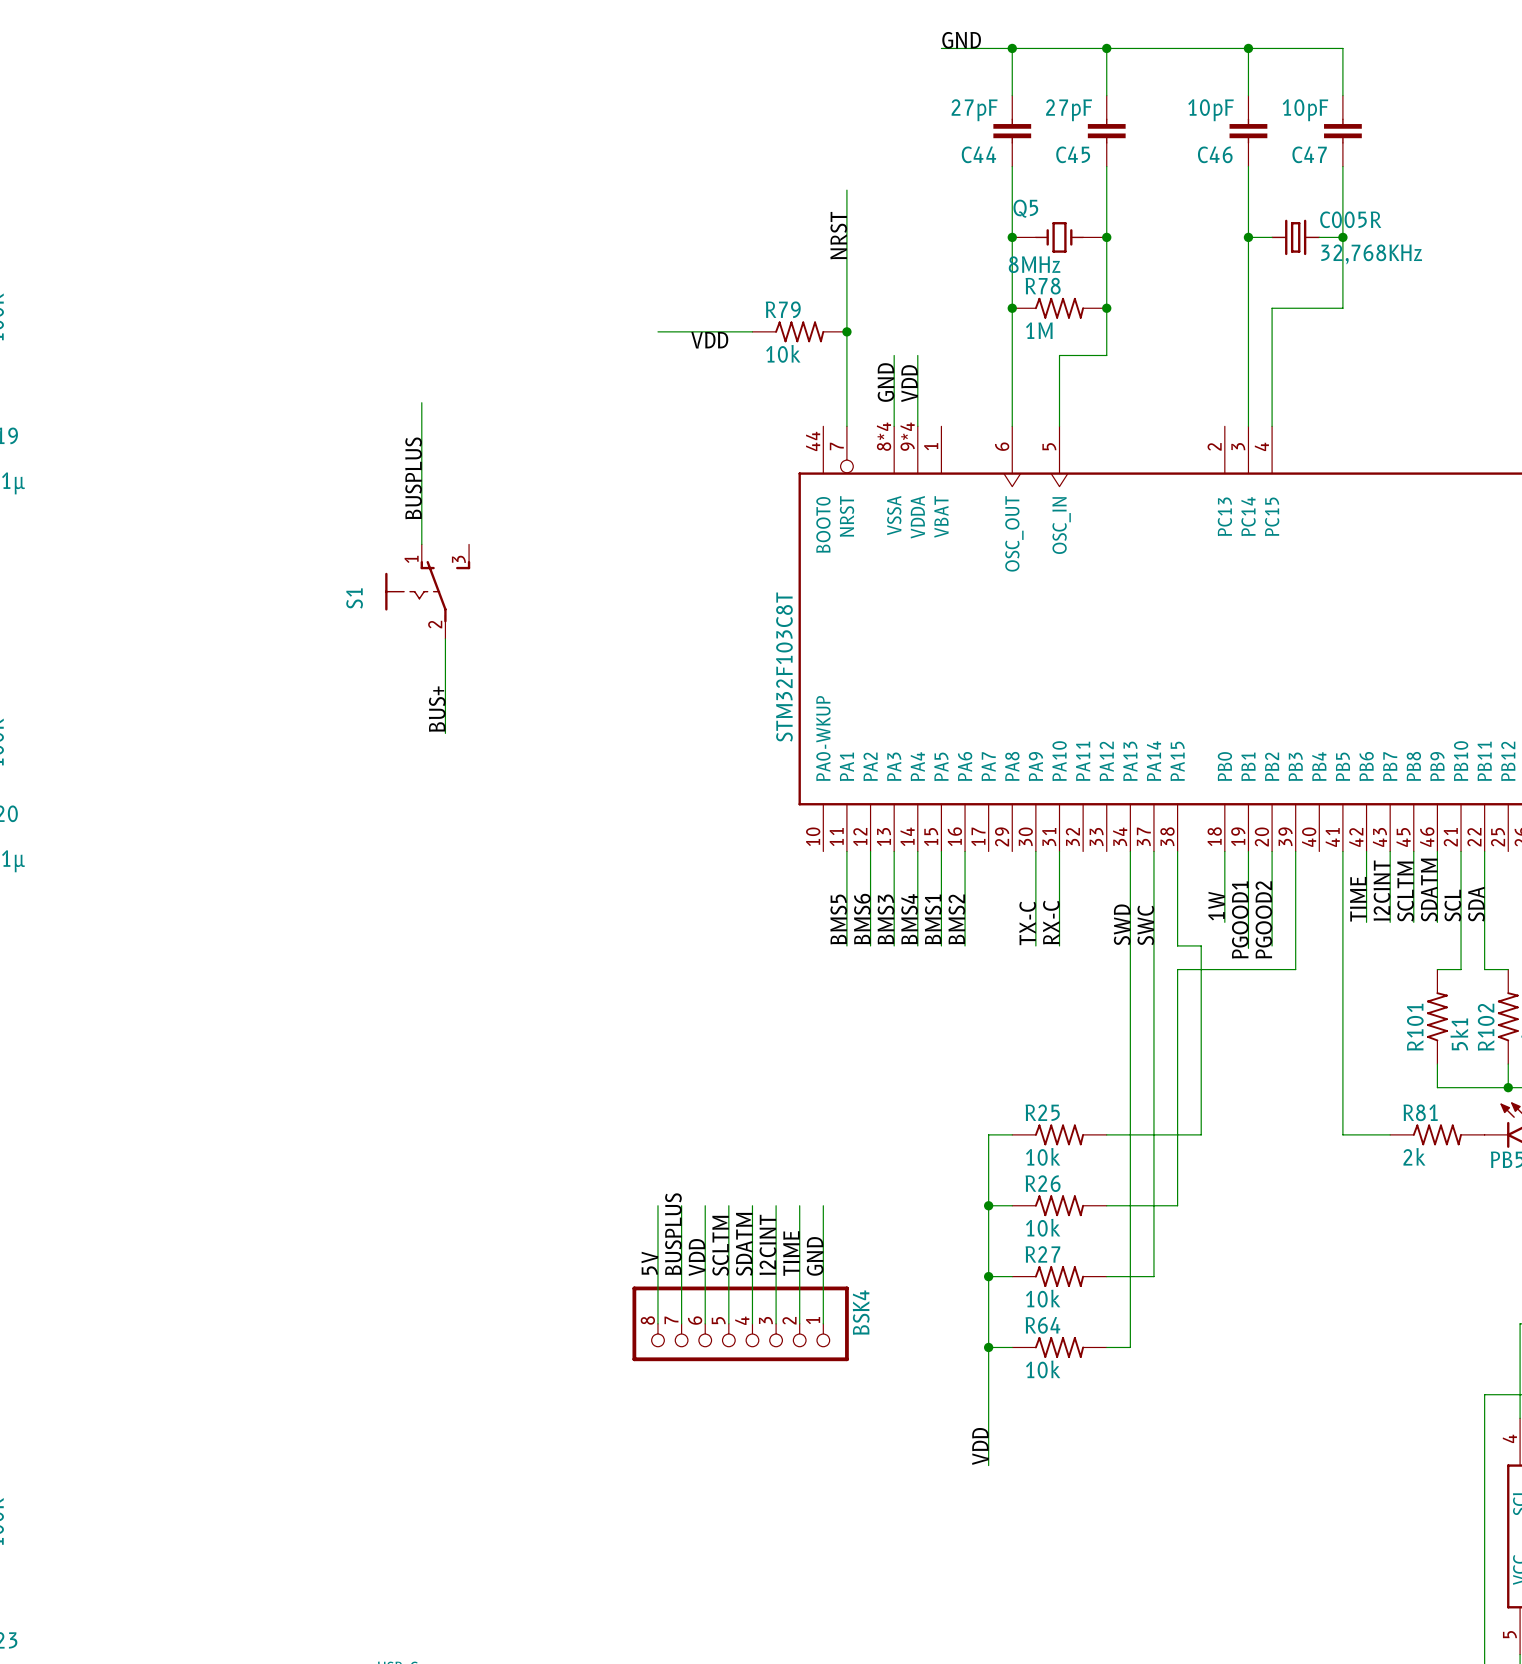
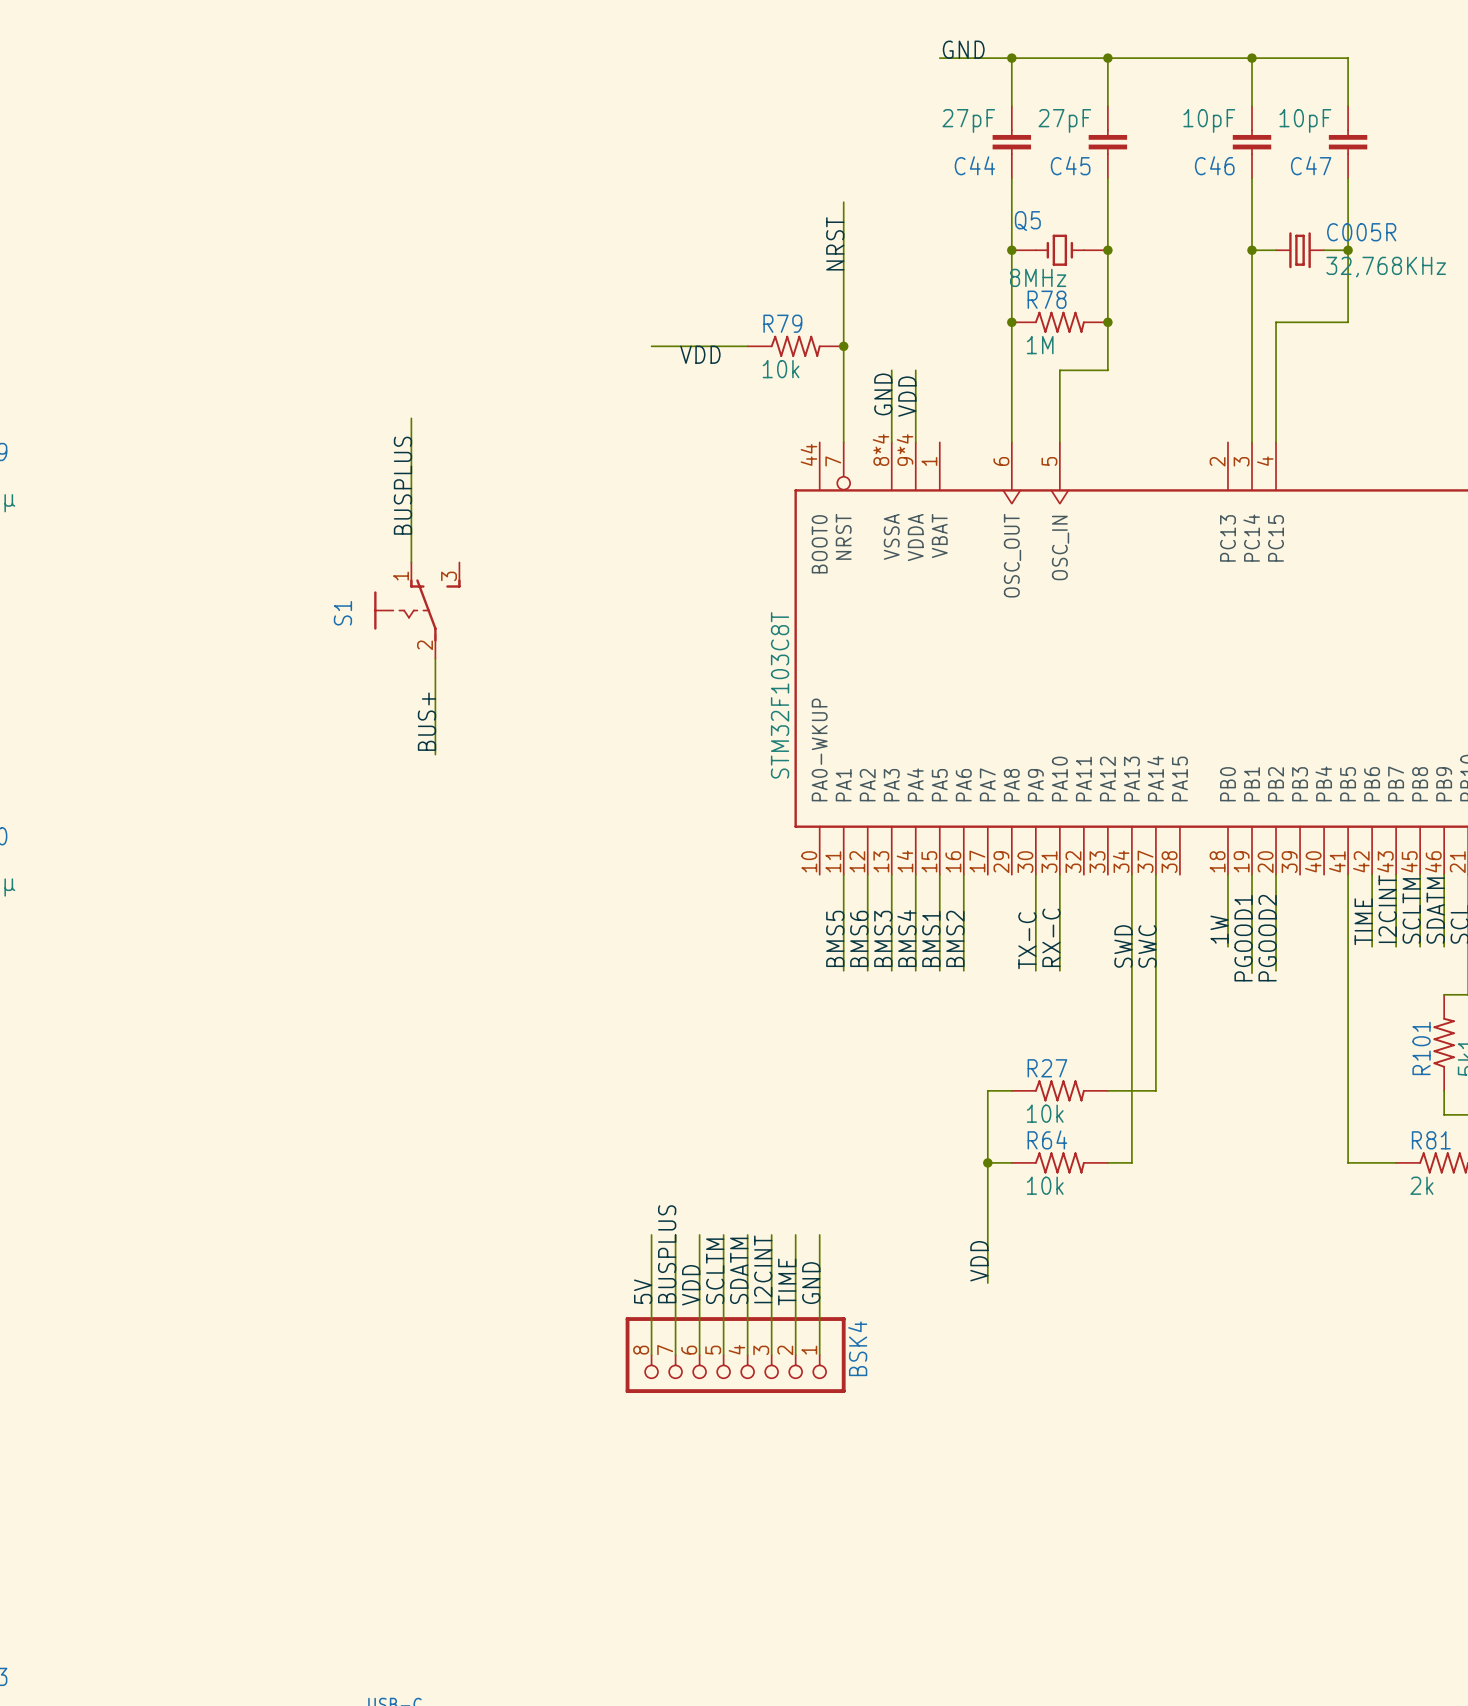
wire: (1177, 851) (1177, 945) (1201, 945) (1201, 1134) (1130, 1134) (1130, 1347) (1106, 1347) -> none
wire: (1295, 851) (1295, 969) (1177, 969) (1177, 1205) (1106, 1205) -> none
wire: none -> (1011, 1090) (987, 1090) (987, 1162)
wire: (1153, 1064) (1153, 1276) (1106, 1276) -> (1155, 1090) (1107, 1090)
R25 name: R25 (1042, 1112) -> R64 (1047, 1139)
junction: none -> (987, 1162)
wire: (988, 1205) (1012, 1205) -> none
junction: (988, 1205) -> none
R26: 10k (1059, 1205) -> none
wire: (988, 1253) (988, 1465) -> none
wire: (988, 1276) (1012, 1276) -> none
junction: (988, 1276) -> none
R27 position: (1059, 1276) -> (1059, 1090)
wire: (988, 1347) (1012, 1347) -> none
junction: (988, 1347) -> none
R64: 10k (1059, 1347) -> none
label position: VDD (980, 1446) -> VDD (979, 1261)

